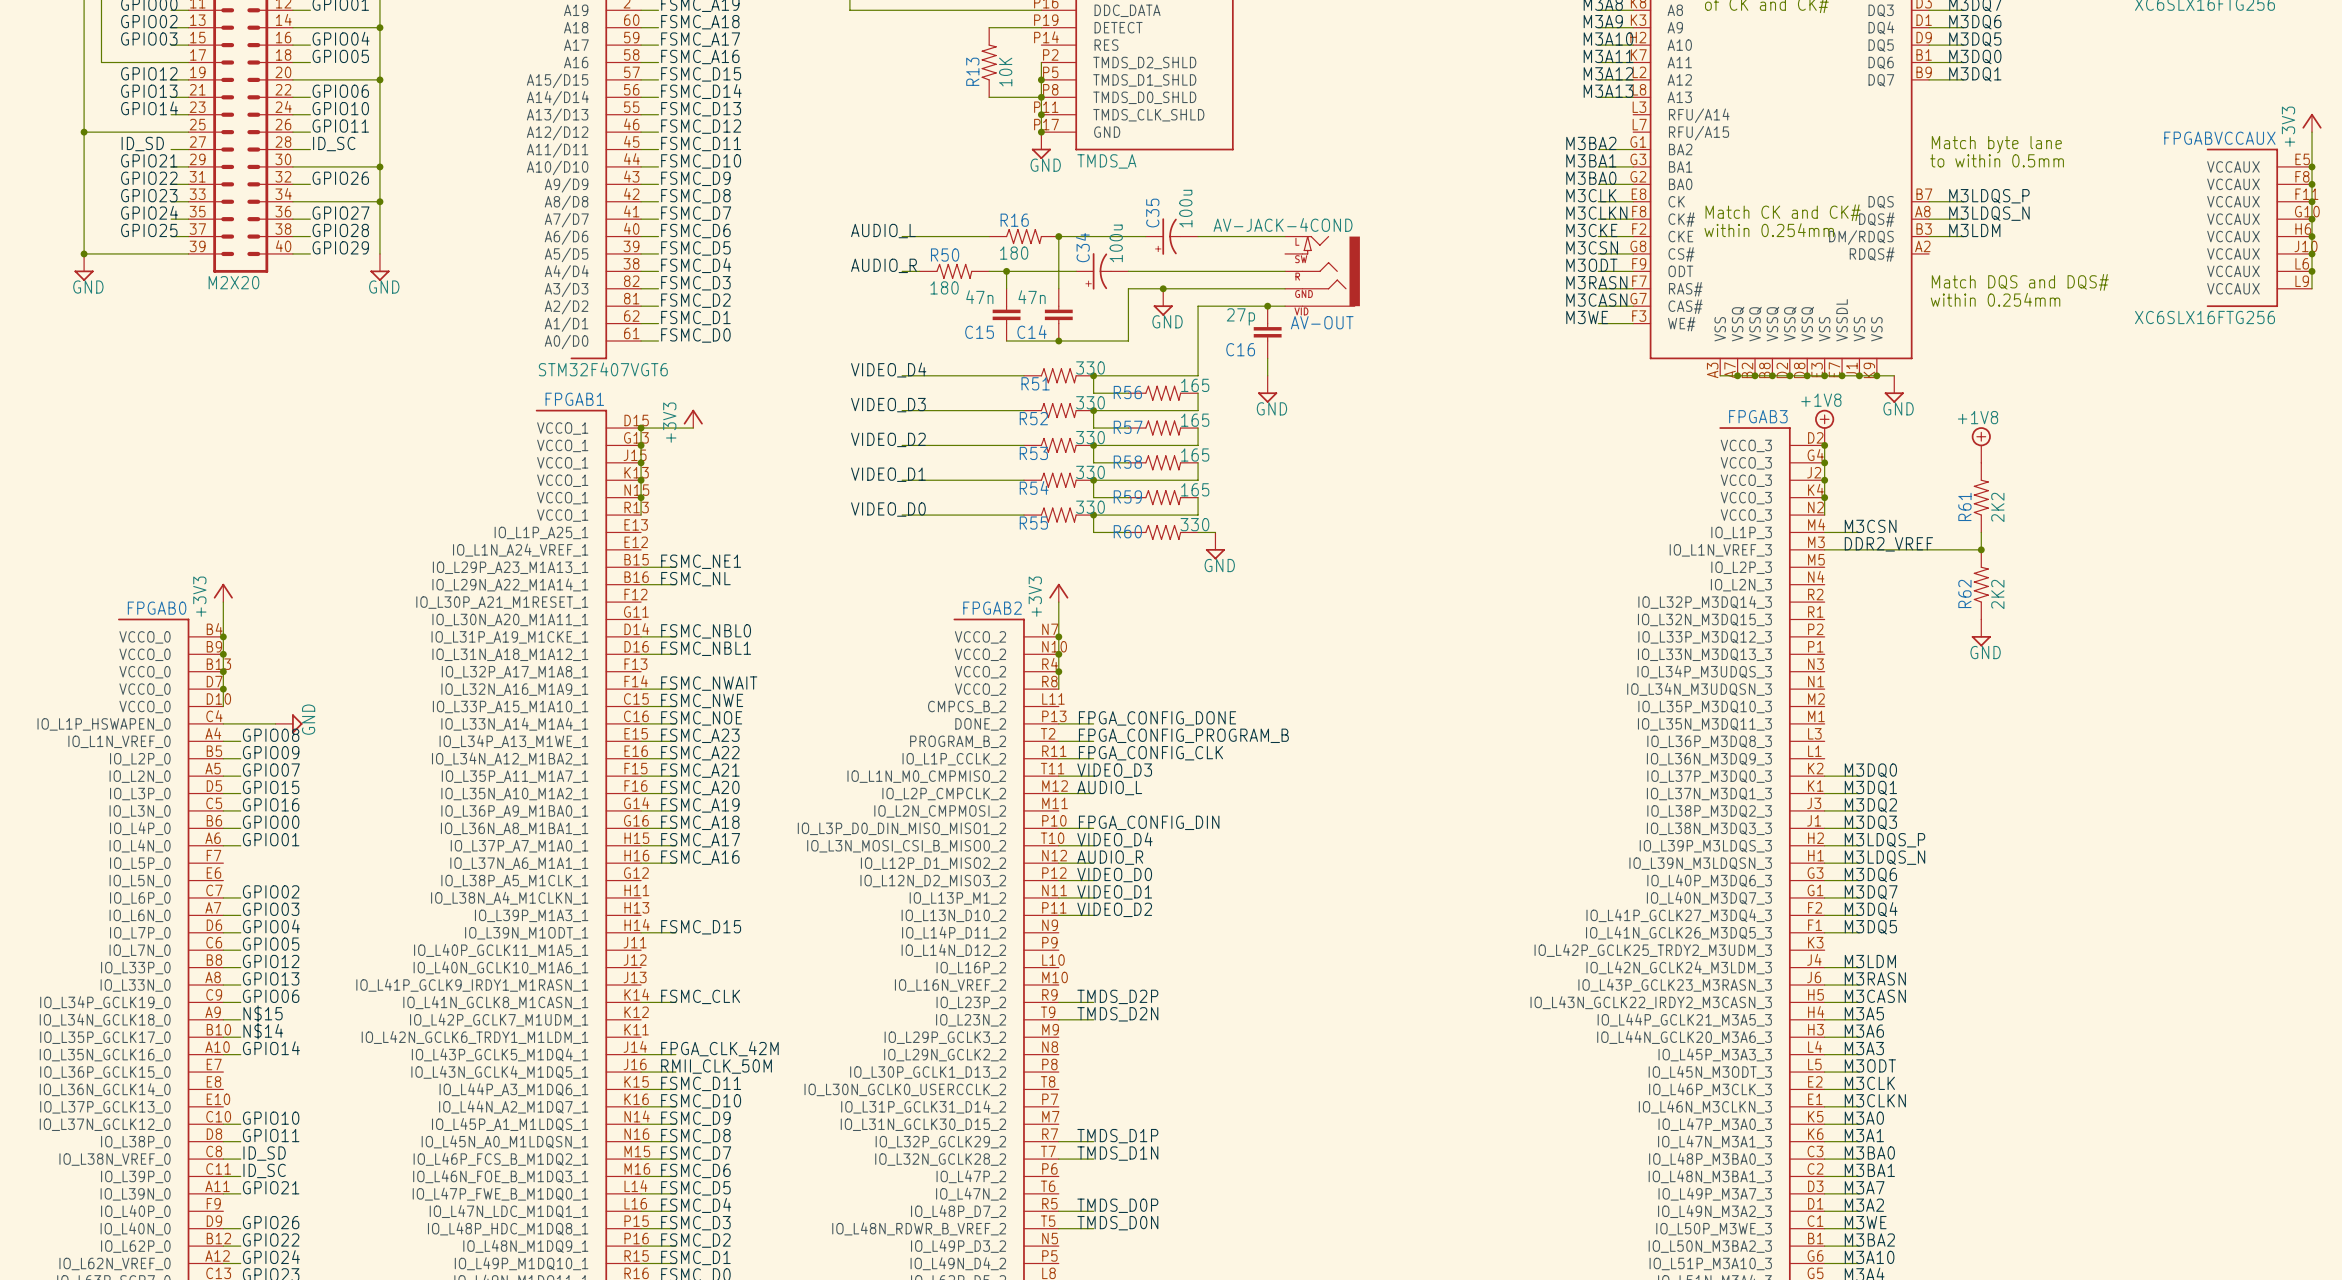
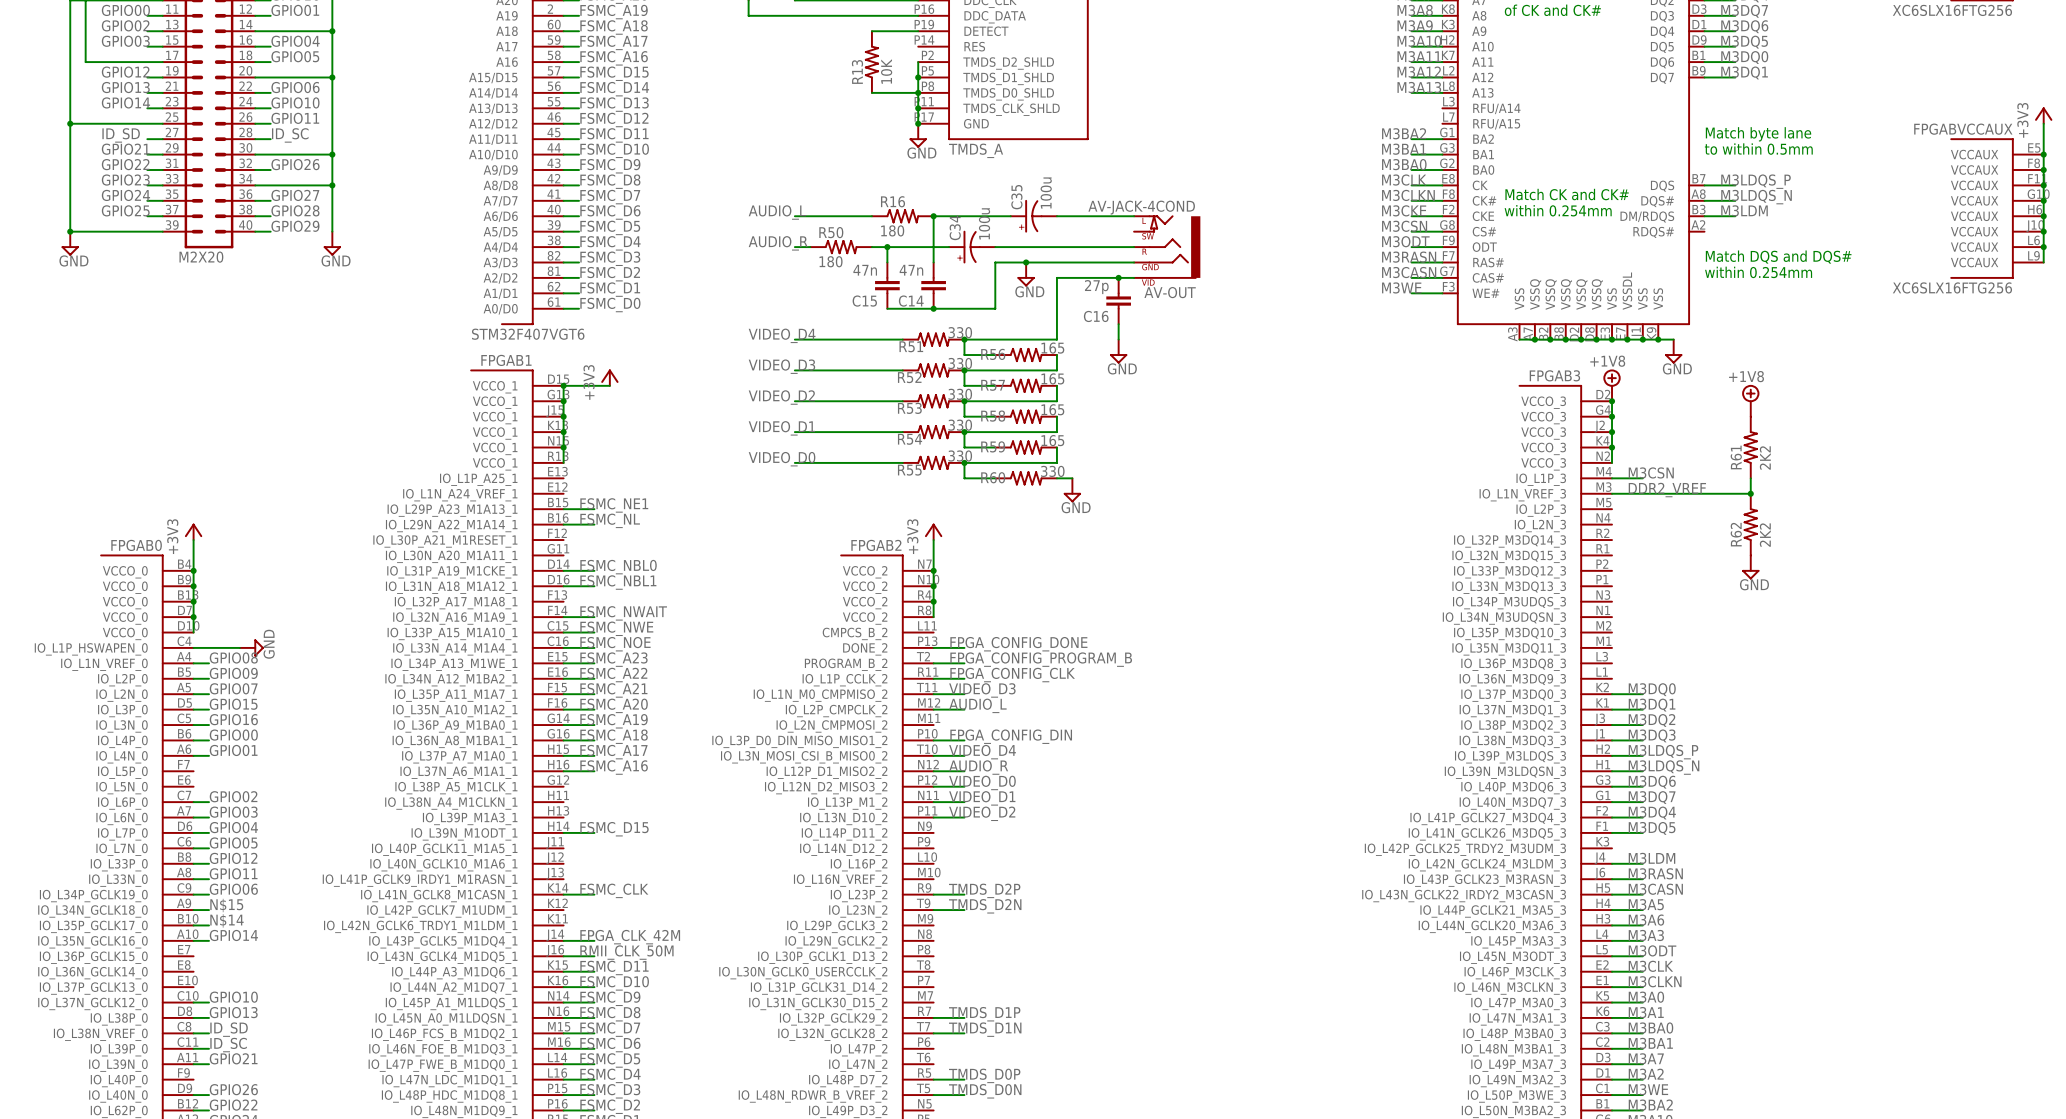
label: GPIO13 (271, 978) -> GPIO11 (233, 873)
label: GPIO11 (271, 1135) -> GPIO13 (233, 1012)

